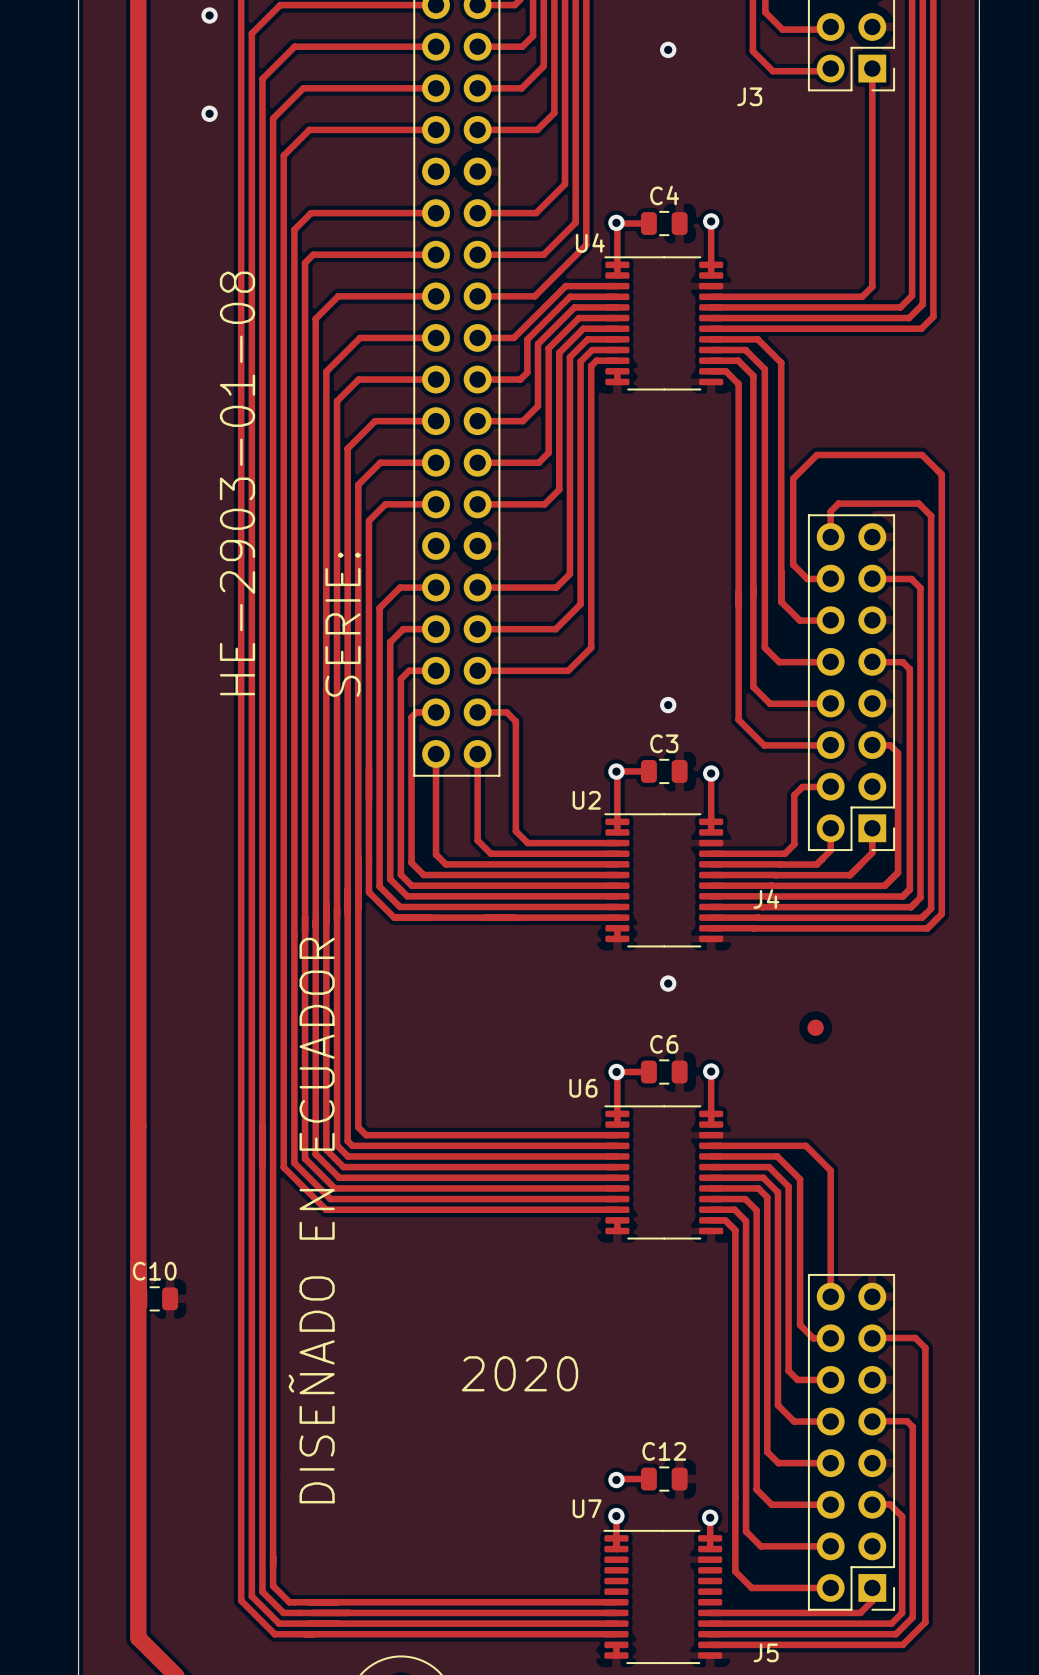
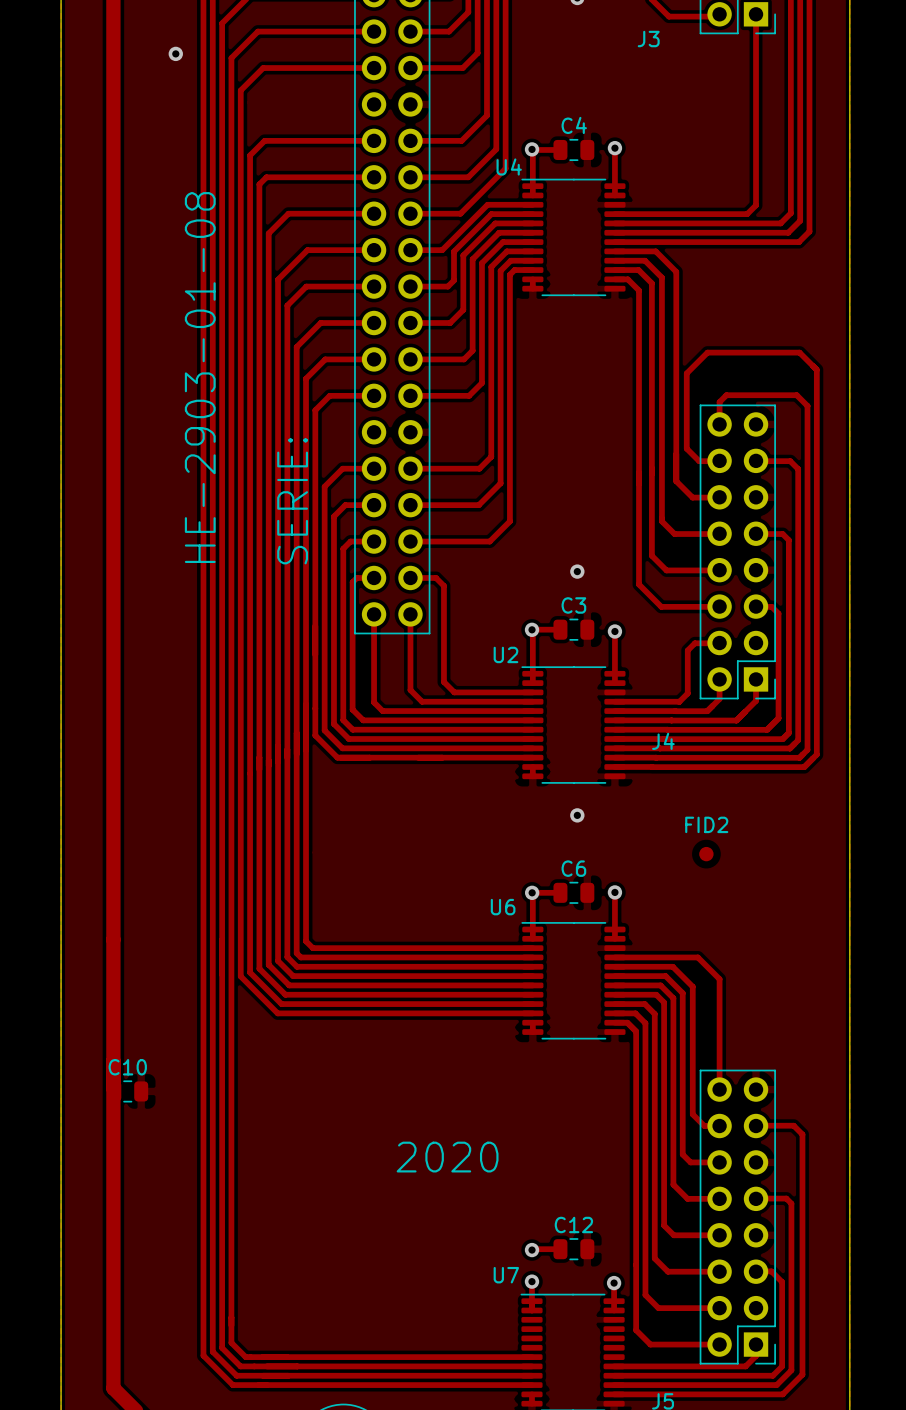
FID2 name: none -> FID2 (706, 824)
text: DISEÑADO EN ECUADOR (311, 1220) -> none

